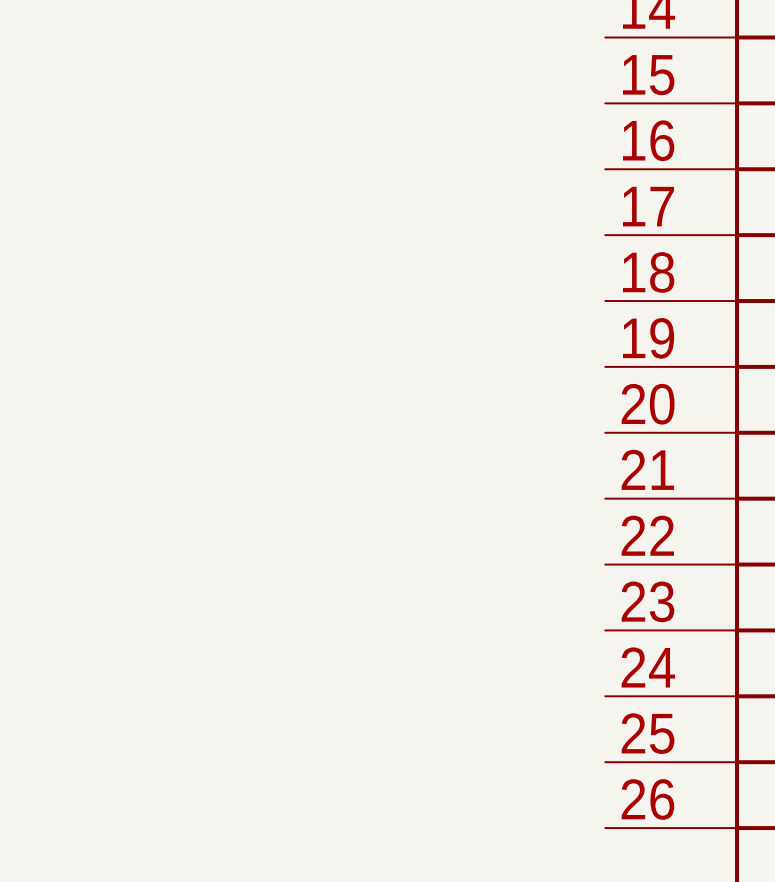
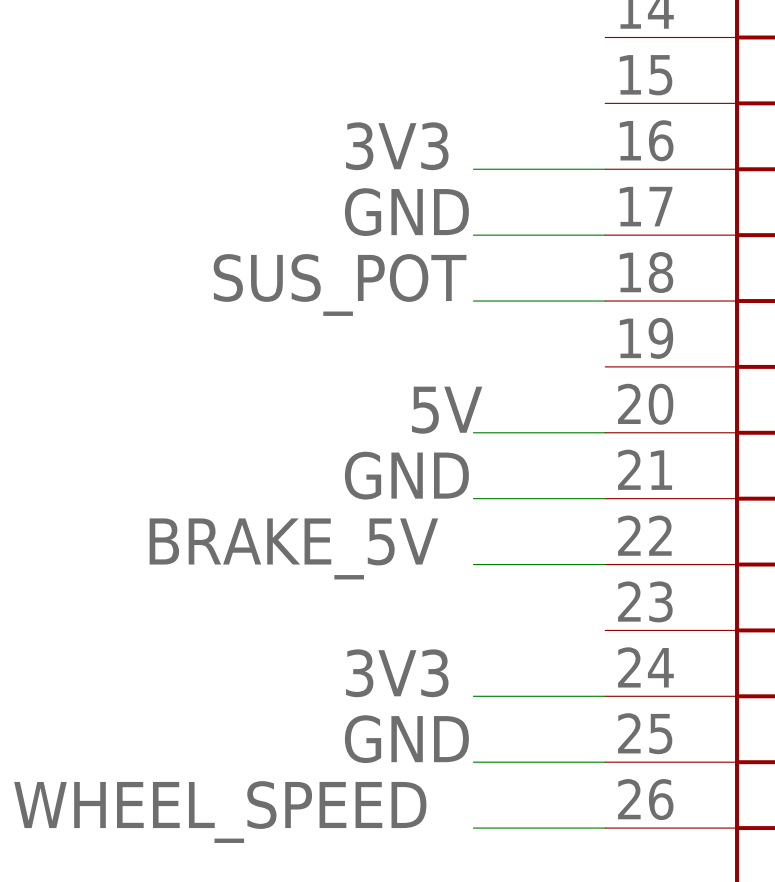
label: none -> 3V3 (397, 146)
wire: none -> (473, 169) (605, 169)
label: none -> GND (406, 212)
wire: none -> (473, 235) (605, 235)
label: none -> SUS_POT (340, 285)
wire: none -> (473, 301) (605, 301)
label: none -> 5V (447, 410)
wire: none -> (473, 432) (605, 432)
label: none -> GND (406, 475)
wire: none -> (473, 498) (605, 498)
label: none -> BRAKE_5V (293, 548)
wire: none -> (473, 564) (605, 564)
label: none -> 3V3 (397, 673)
wire: none -> (473, 696) (605, 696)
label: none -> GND (406, 739)
wire: none -> (473, 762) (605, 762)
label: none -> WHEEL_SPEED (220, 812)
wire: none -> (473, 828) (605, 828)

